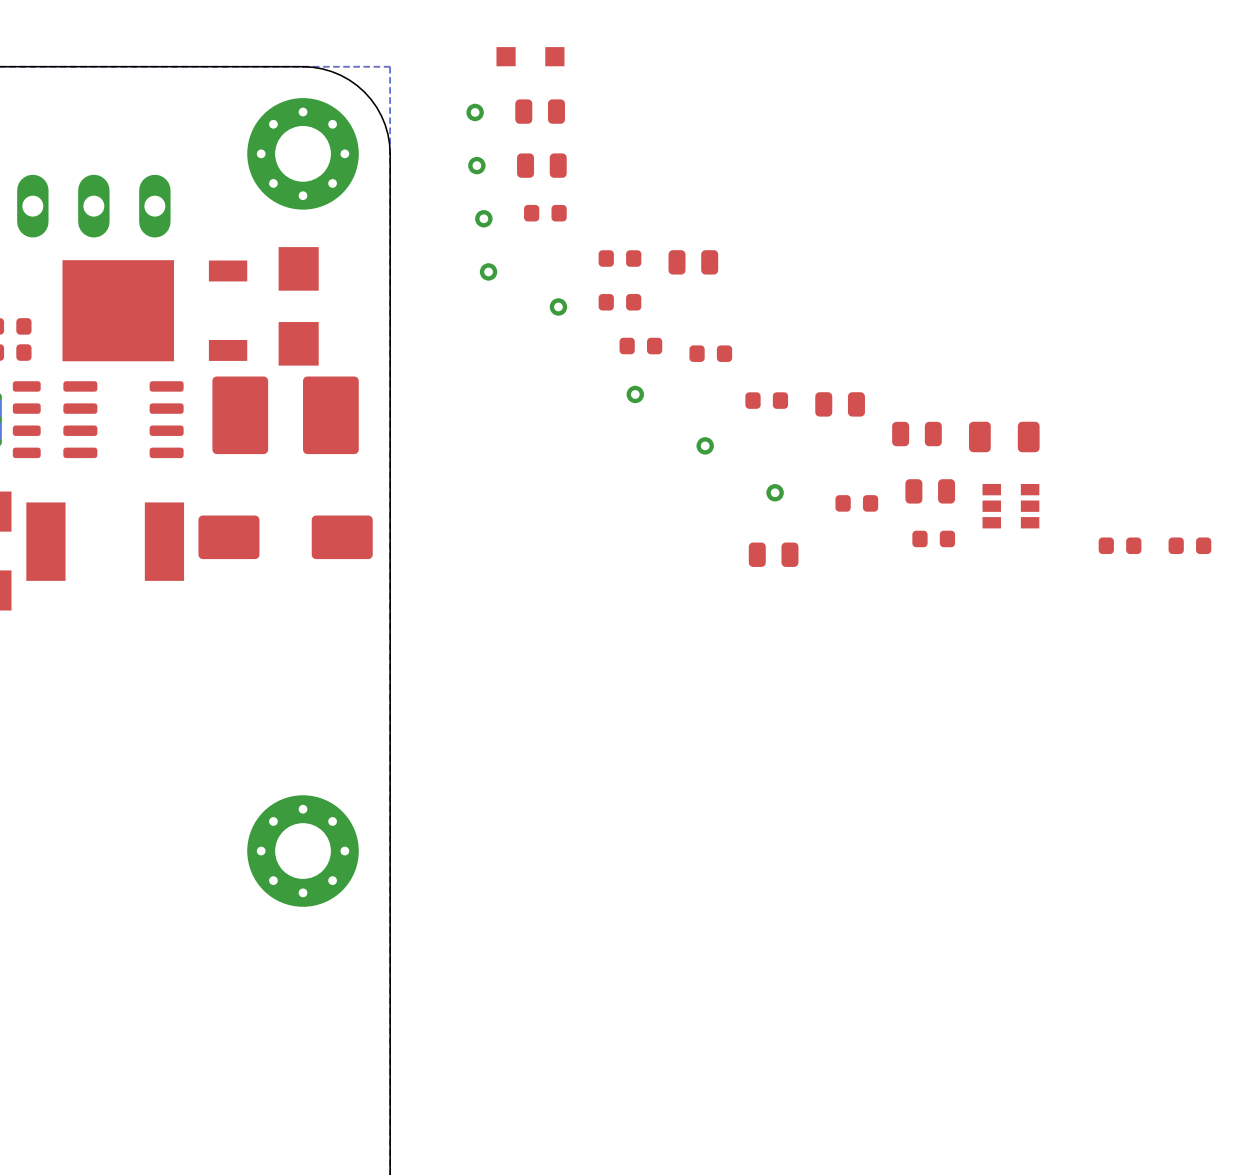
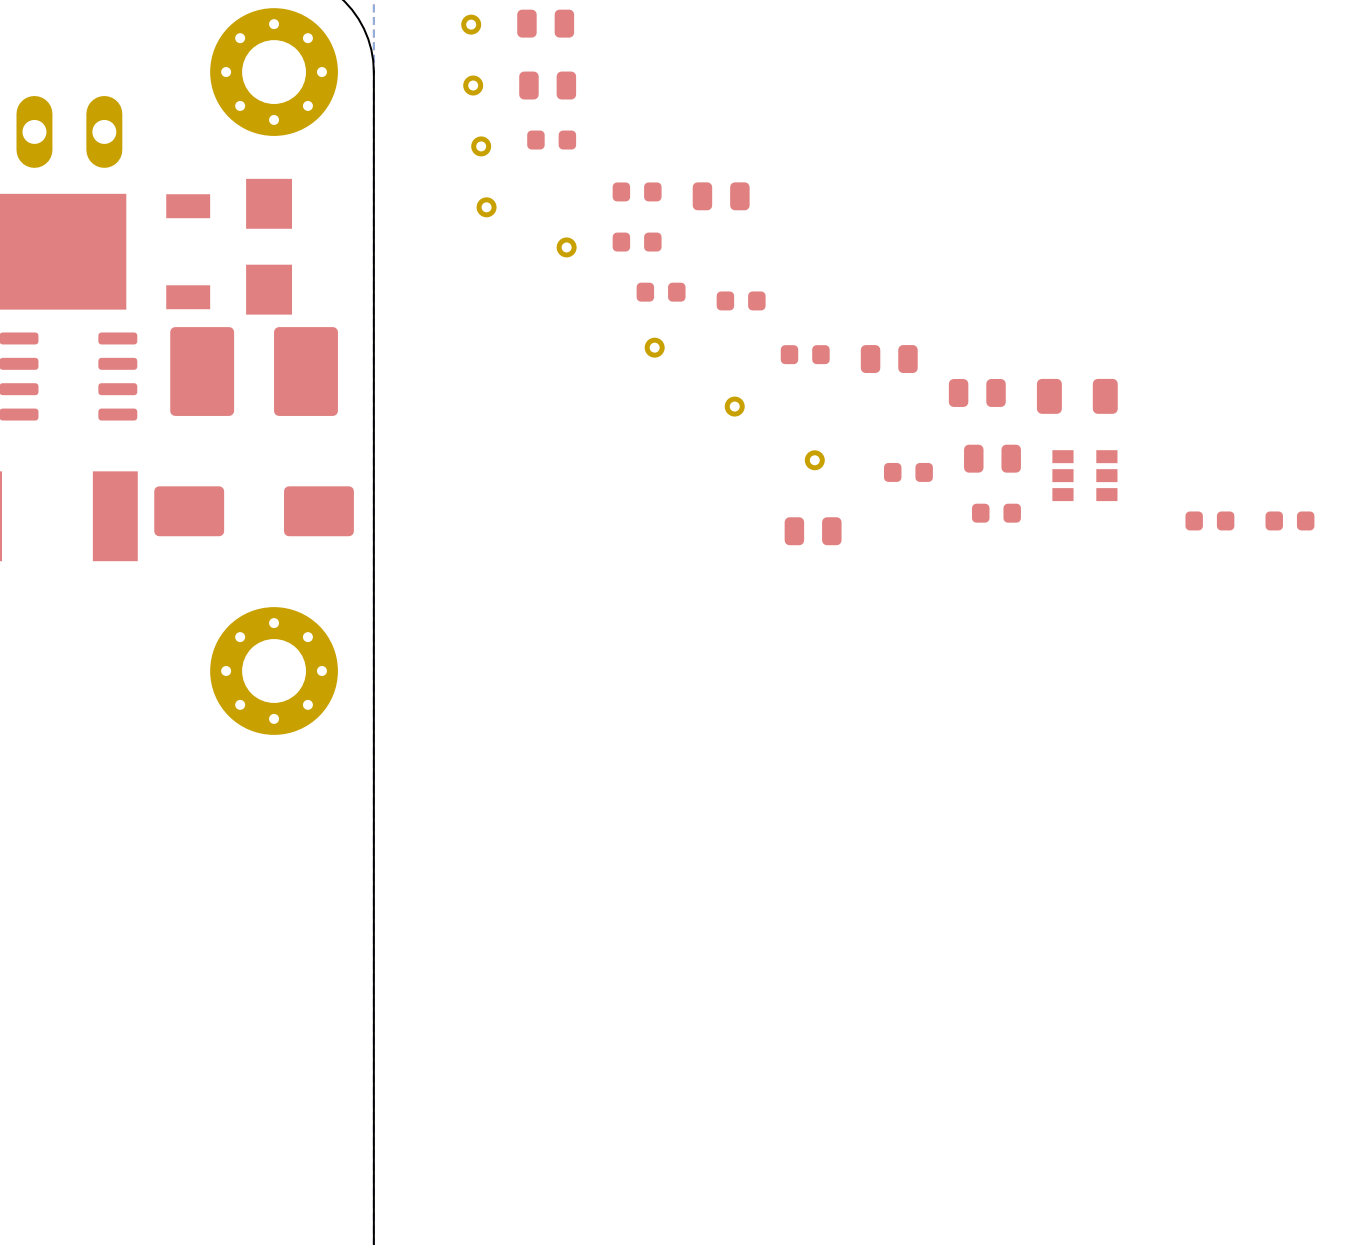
part position: (303, 851) -> (274, 670)

